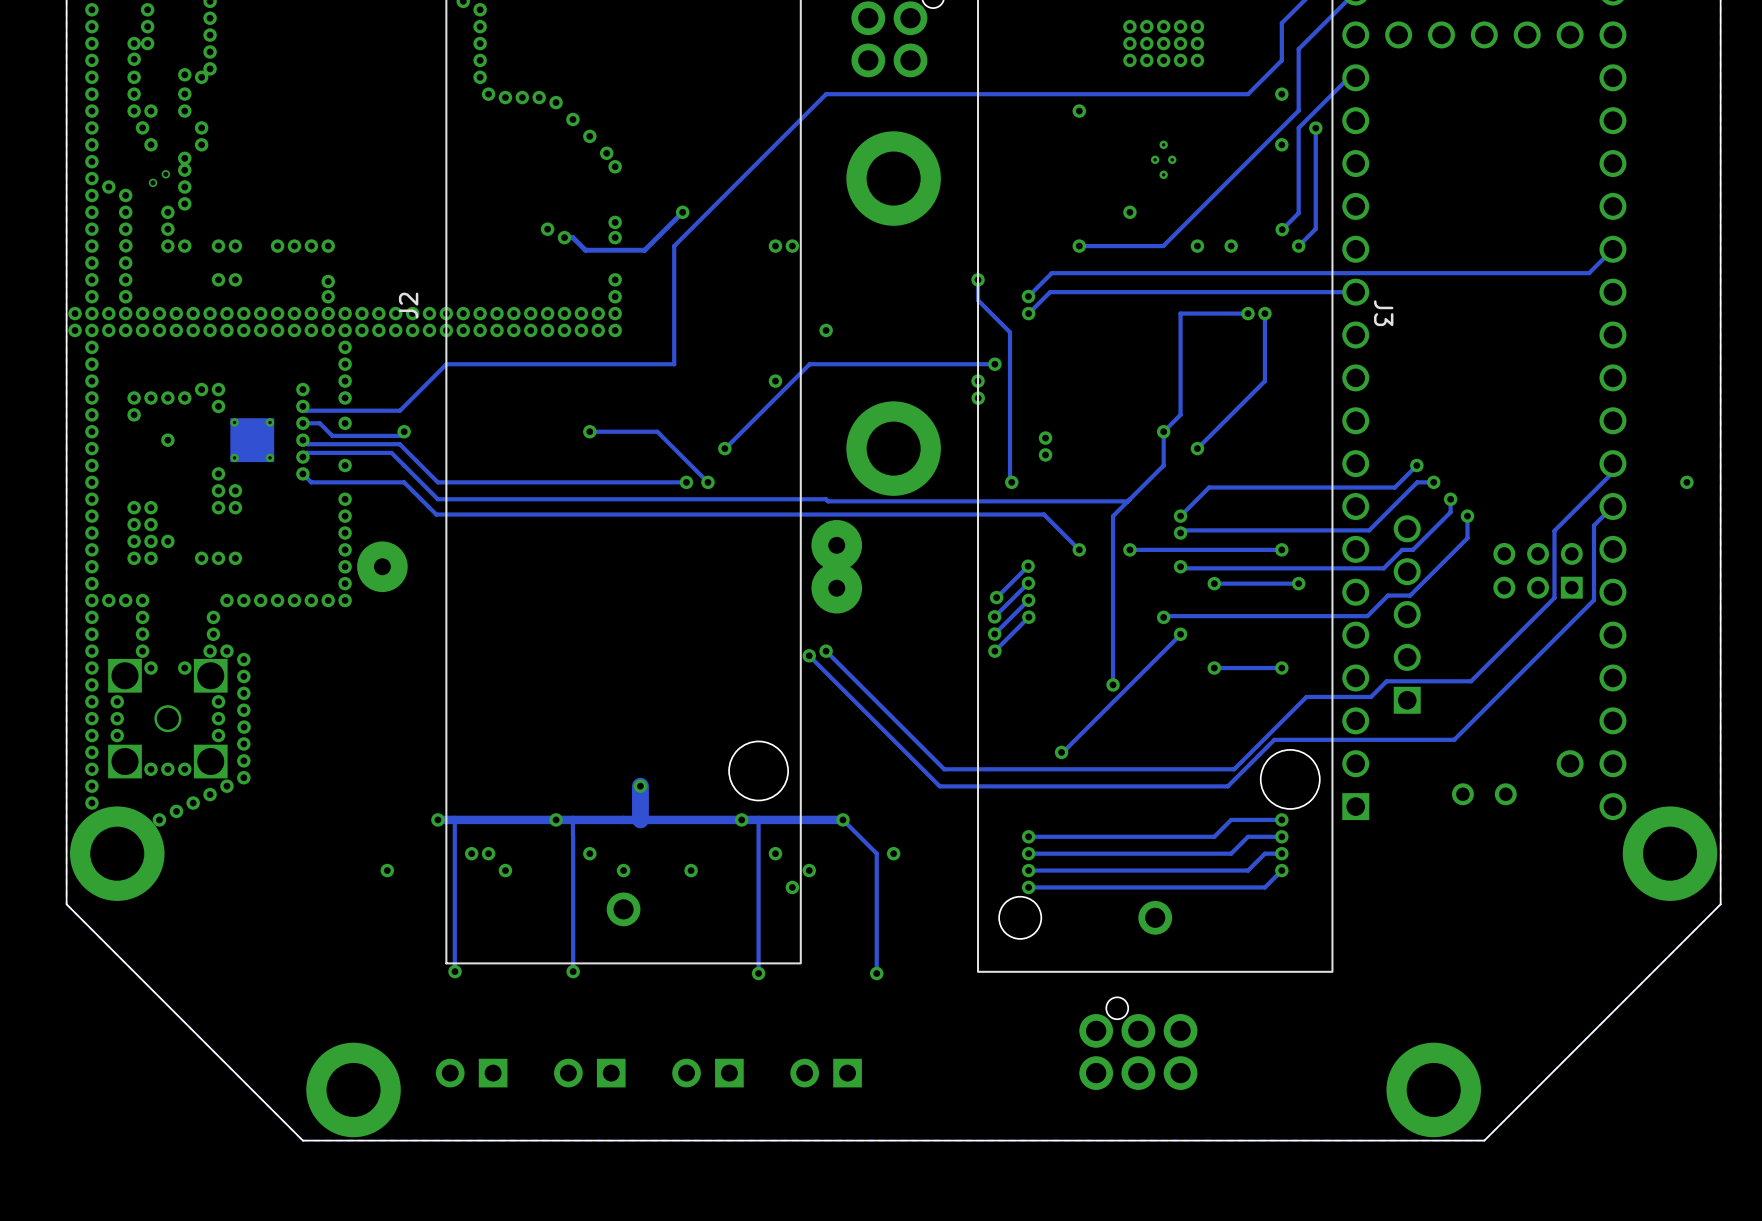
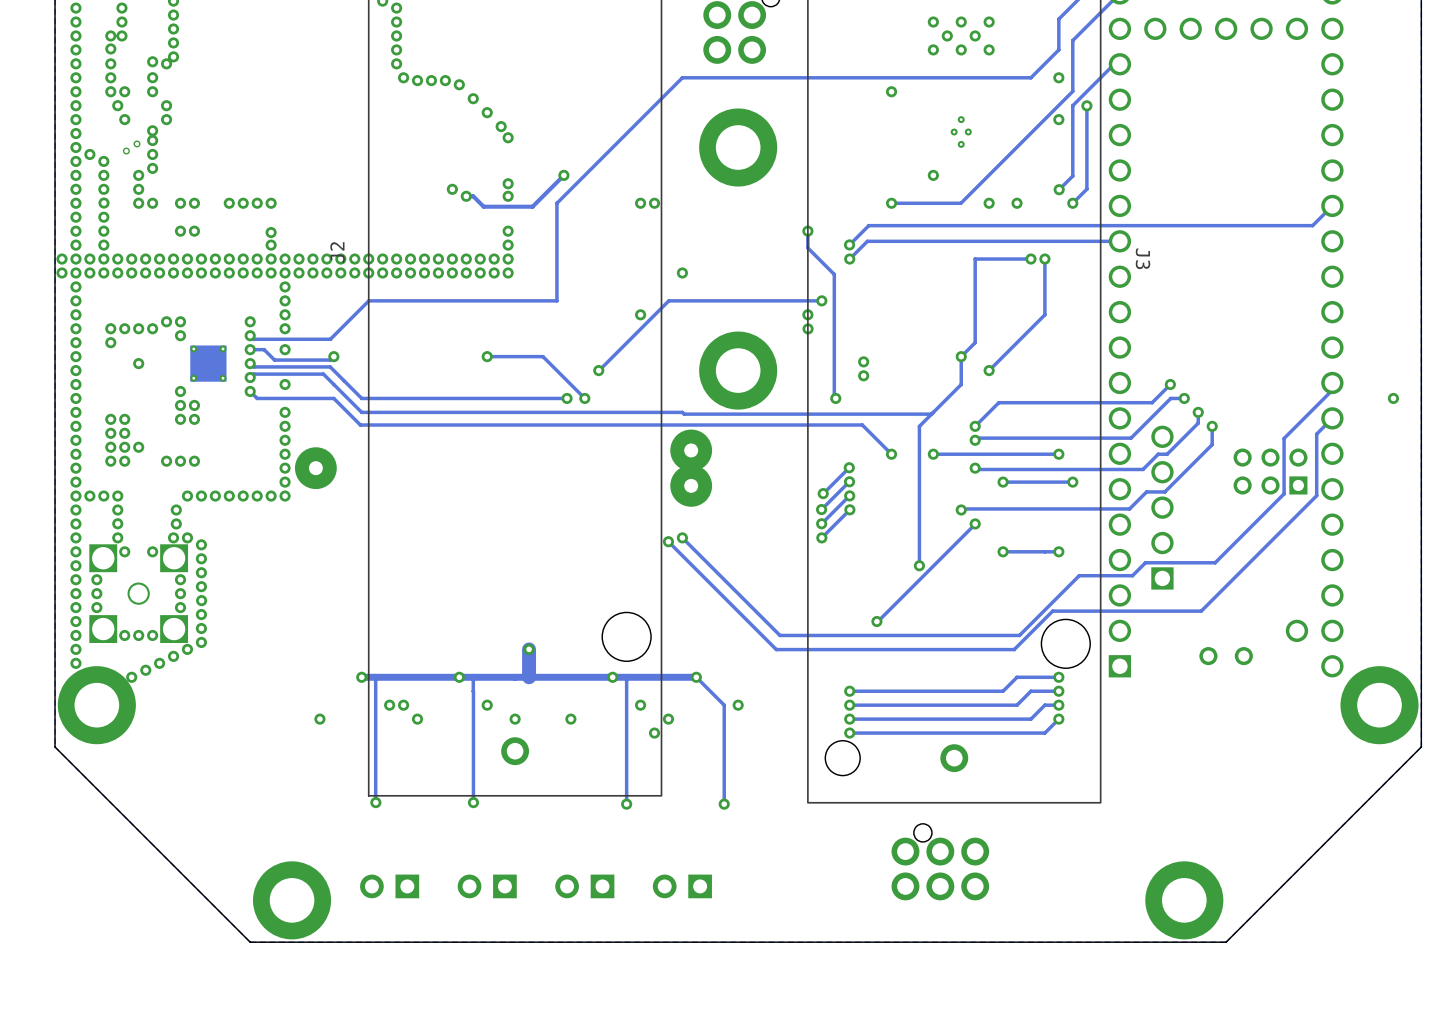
via: (1146, 26) -> none
via: (1180, 26) -> none
via: (1129, 43) -> none
via: (1163, 43) -> none
via: (1197, 43) -> none
via: (1146, 60) -> none
via: (1180, 60) -> none

